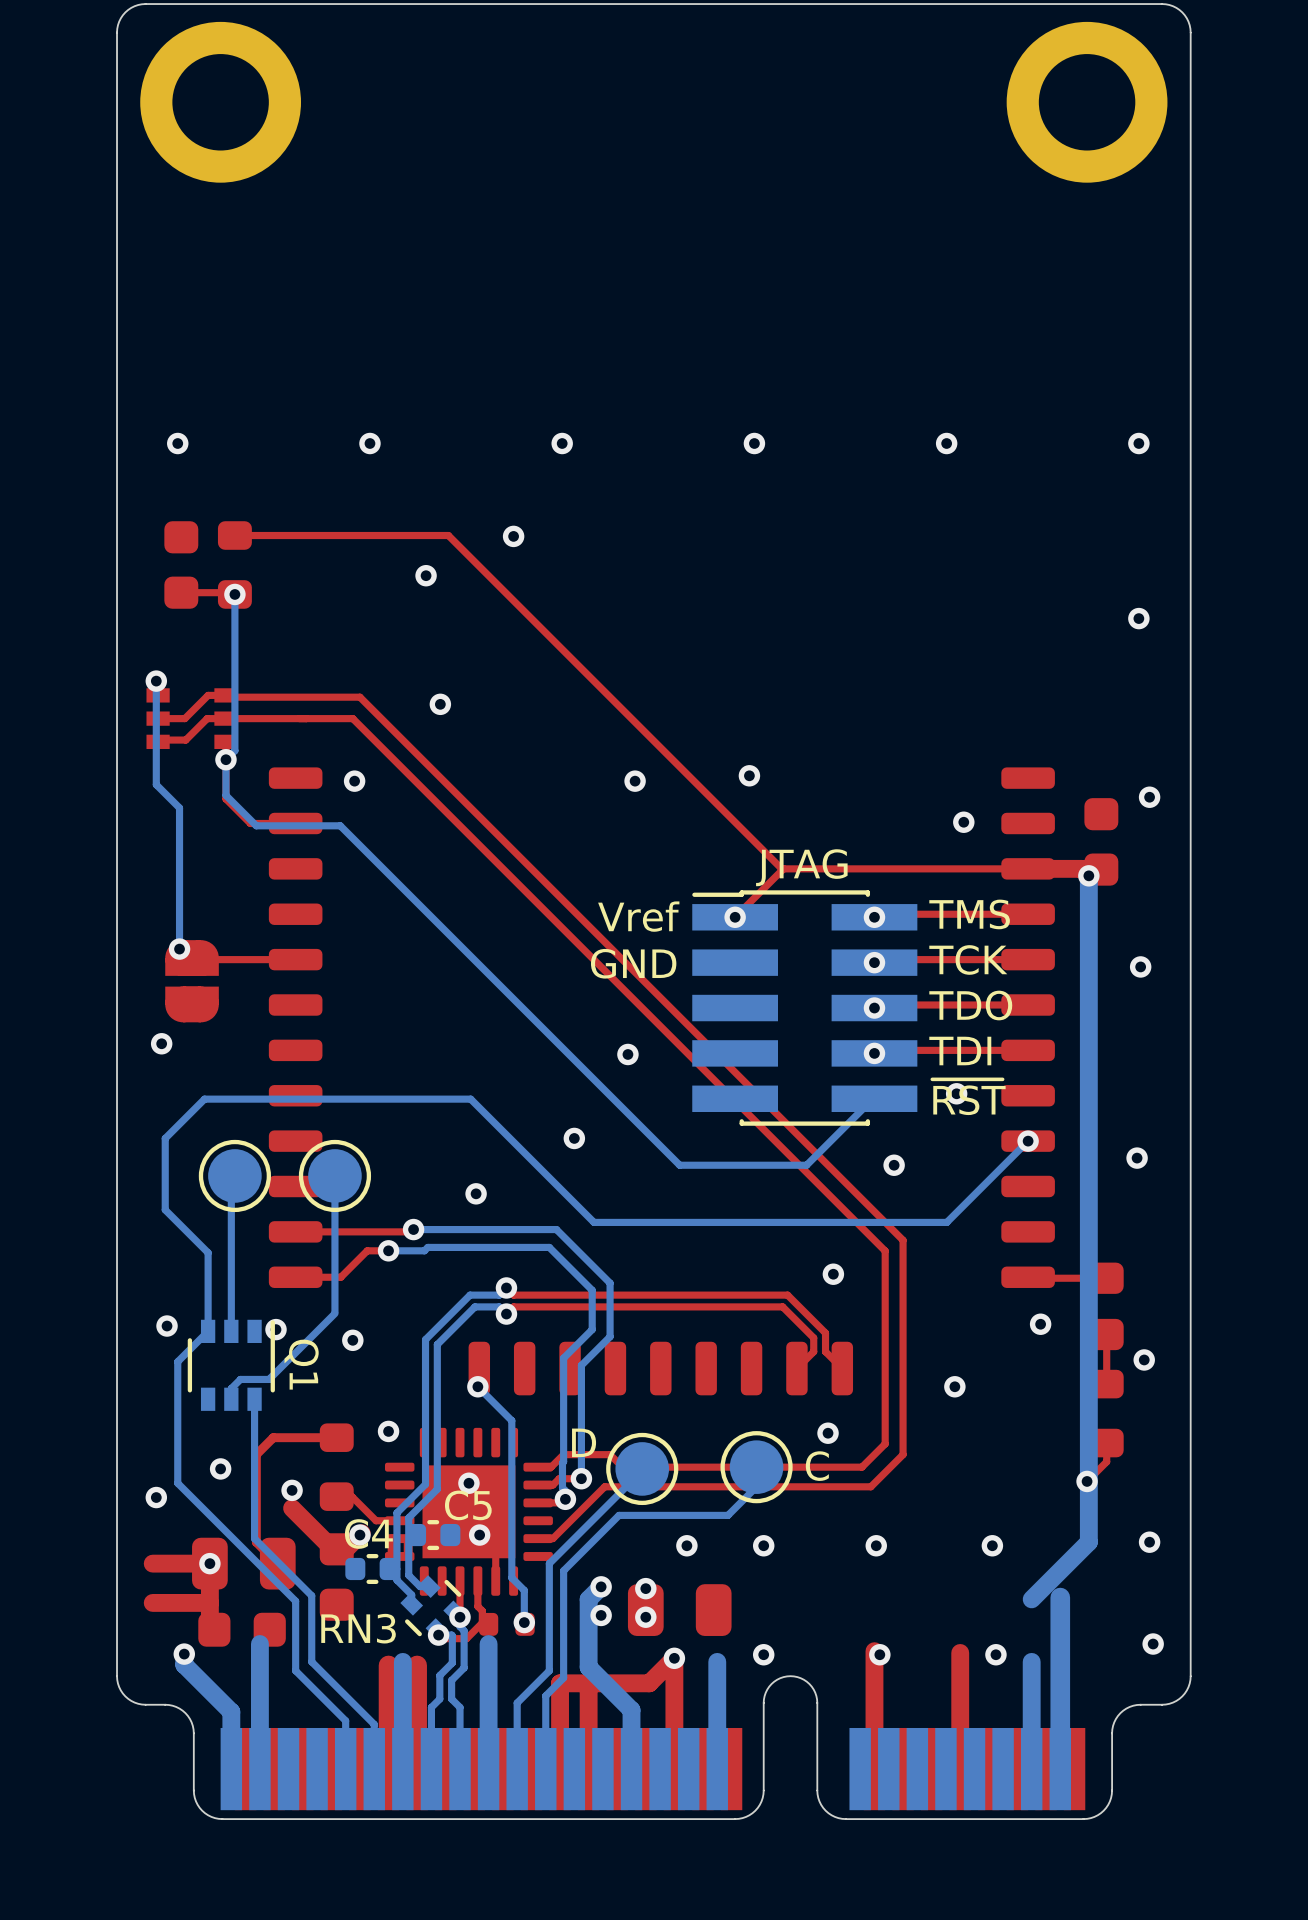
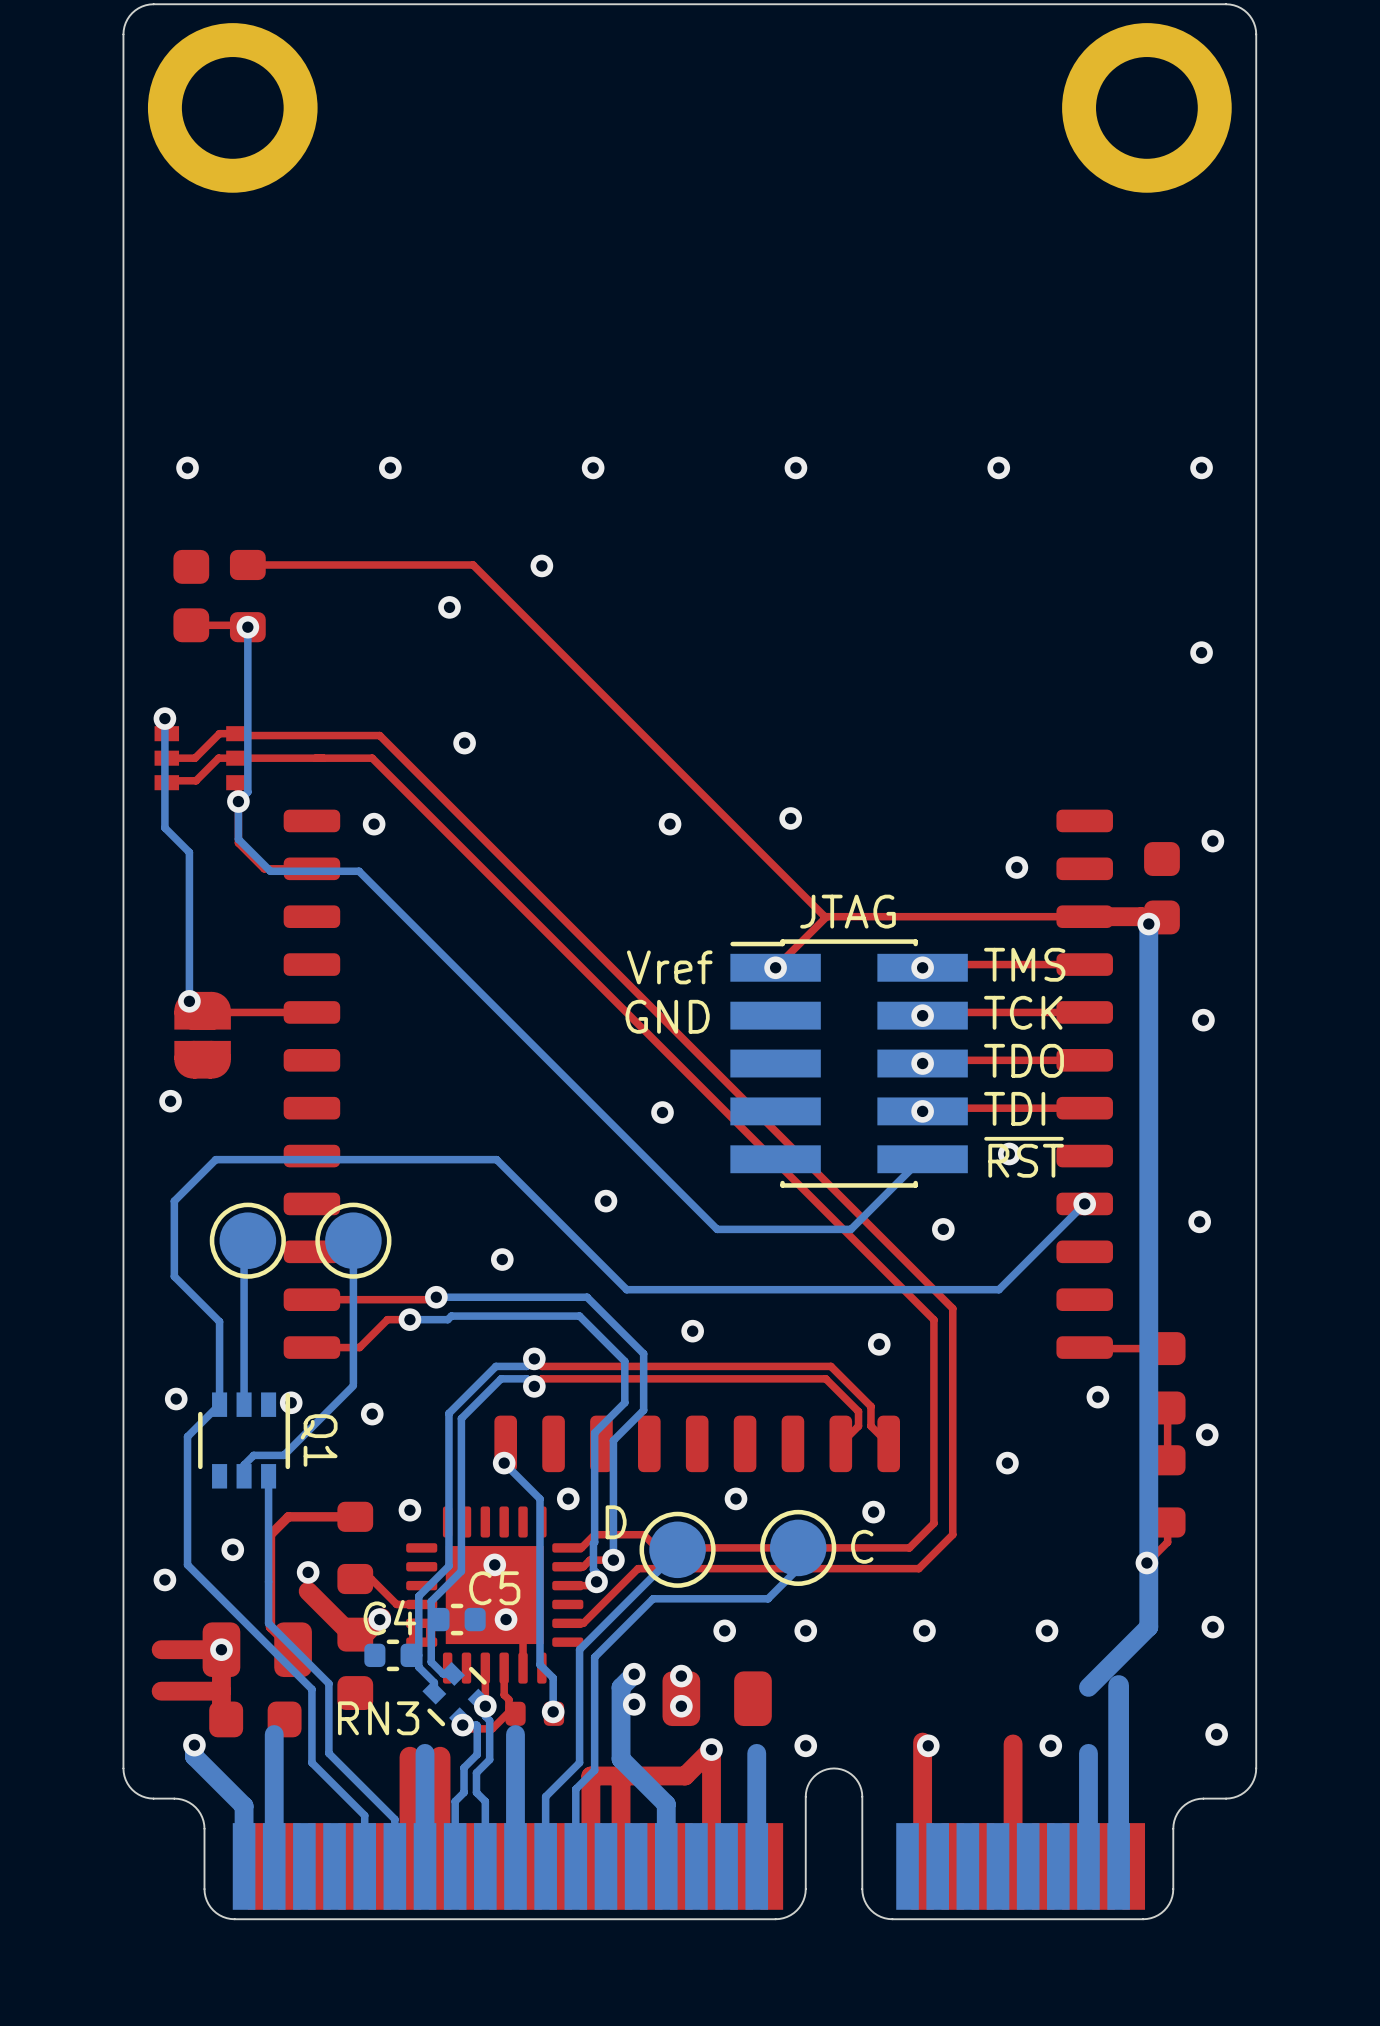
via: none -> (692, 1331)
via: none -> (568, 1498)
via: none -> (736, 1498)

